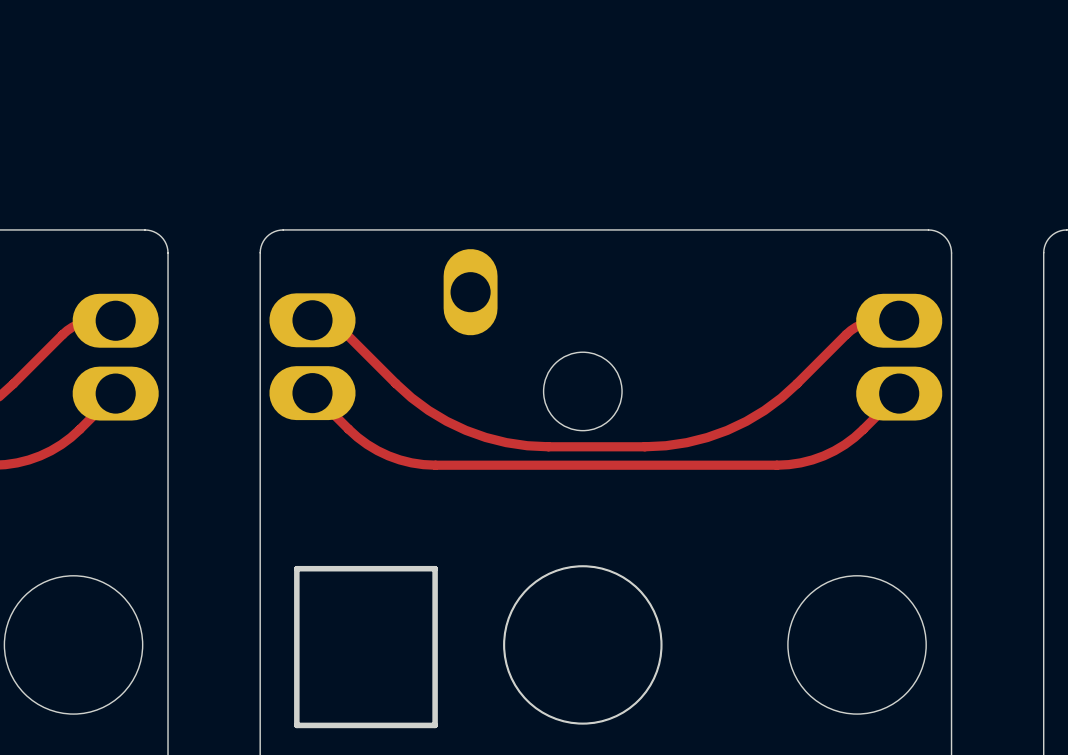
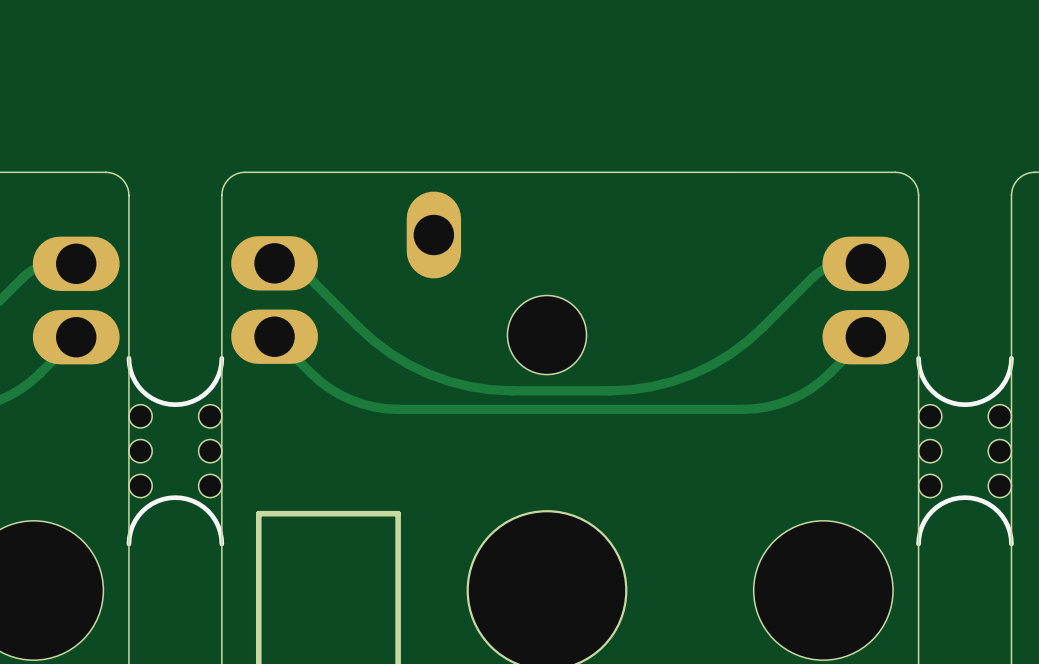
part: none -> (175, 451)
part: none -> (965, 451)

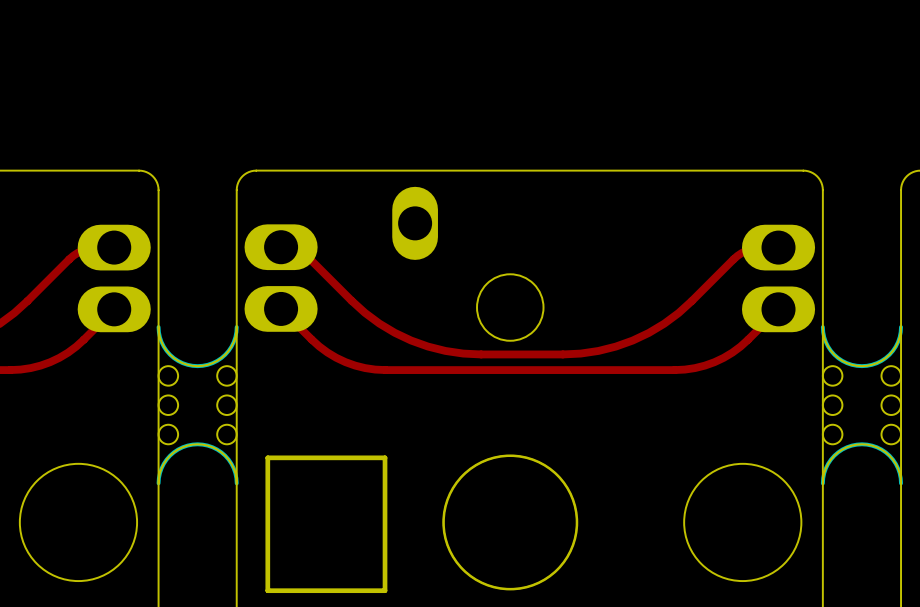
board edge: none -> (158, 327) (161, 342) (170, 354) (182, 363) (197, 366) (212, 363) (225, 354) (233, 342) (236, 327)
board edge: none -> (822, 327) (825, 342) (834, 354) (846, 363) (861, 366) (876, 363) (889, 354) (898, 342) (901, 327)
board edge: none -> (158, 483) (161, 468) (170, 455) (182, 447) (197, 444) (212, 447) (225, 455) (233, 468) (236, 483)
board edge: none -> (822, 483) (825, 468) (834, 455) (846, 447) (861, 444) (876, 447) (889, 455) (898, 468) (901, 483)

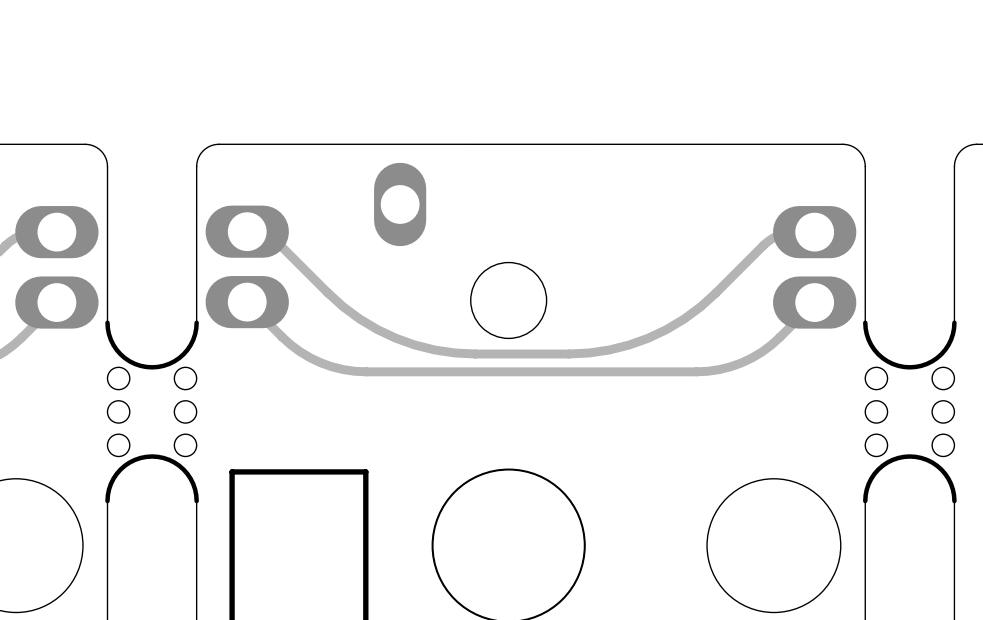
board edge: (158, 327) (158, 483) -> none
board edge: (236, 327) (236, 483) -> none
board edge: (822, 327) (822, 483) -> none
board edge: (901, 327) (901, 483) -> none

